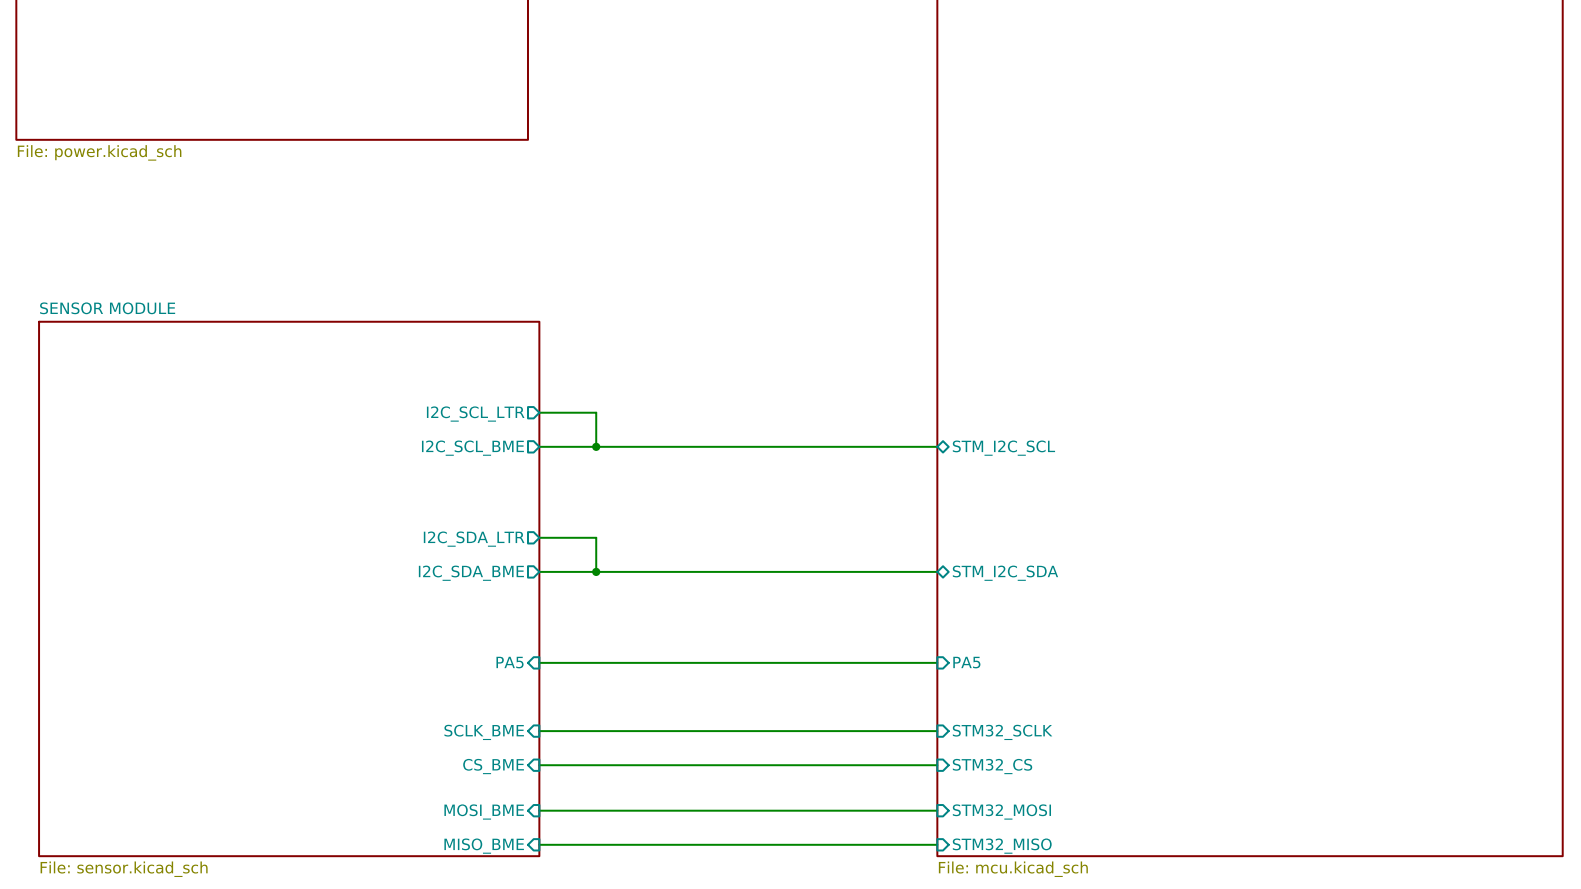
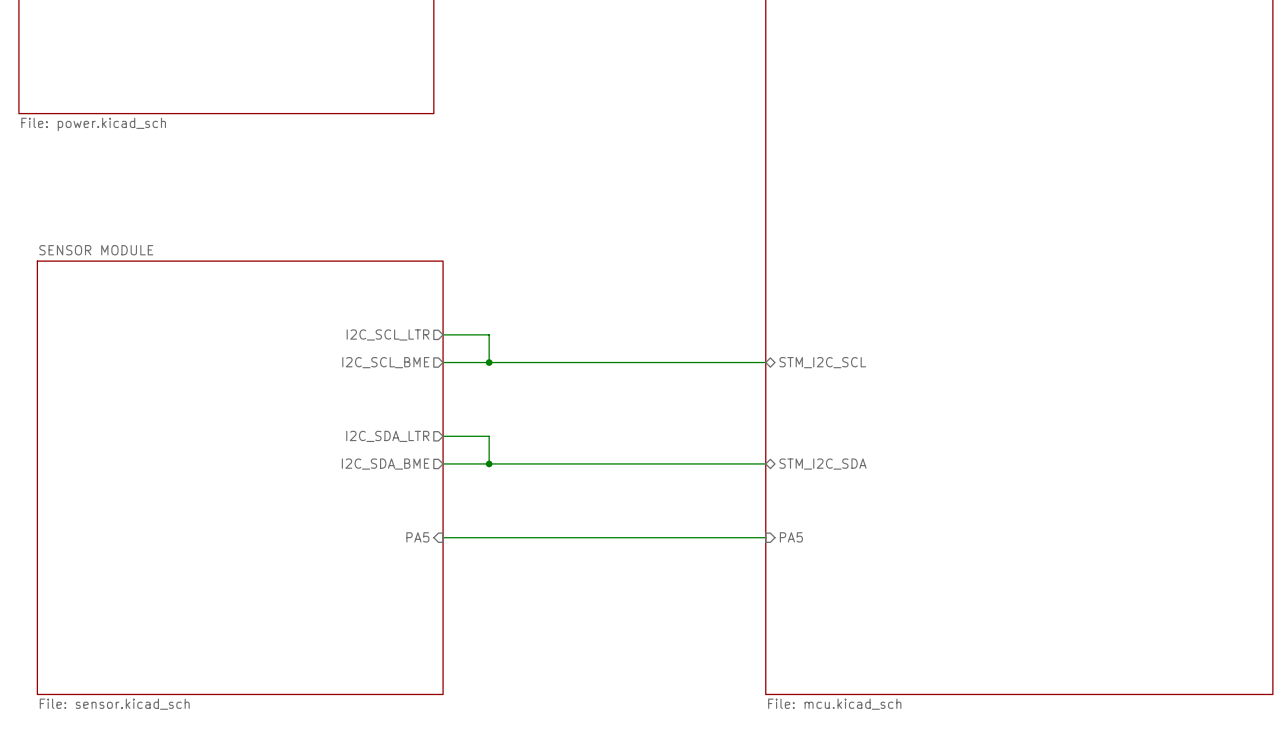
wire: (539, 731) (937, 731) -> none
sheet pin: SCLK_BME (484, 732) -> none
sheet pin: STM32_SCLK (1002, 732) -> none
wire: (539, 765) (937, 765) -> none
sheet pin: CS_BME (493, 766) -> none
sheet pin: STM32_CS (992, 766) -> none
wire: (539, 810) (937, 810) -> none
sheet pin: MOSI_BME (484, 812) -> none
sheet pin: STM32_MOSI (1001, 812) -> none
wire: (539, 844) (937, 844) -> none
sheet pin: MISO_BME (484, 846) -> none
sheet pin: STM32_MISO (1002, 846) -> none

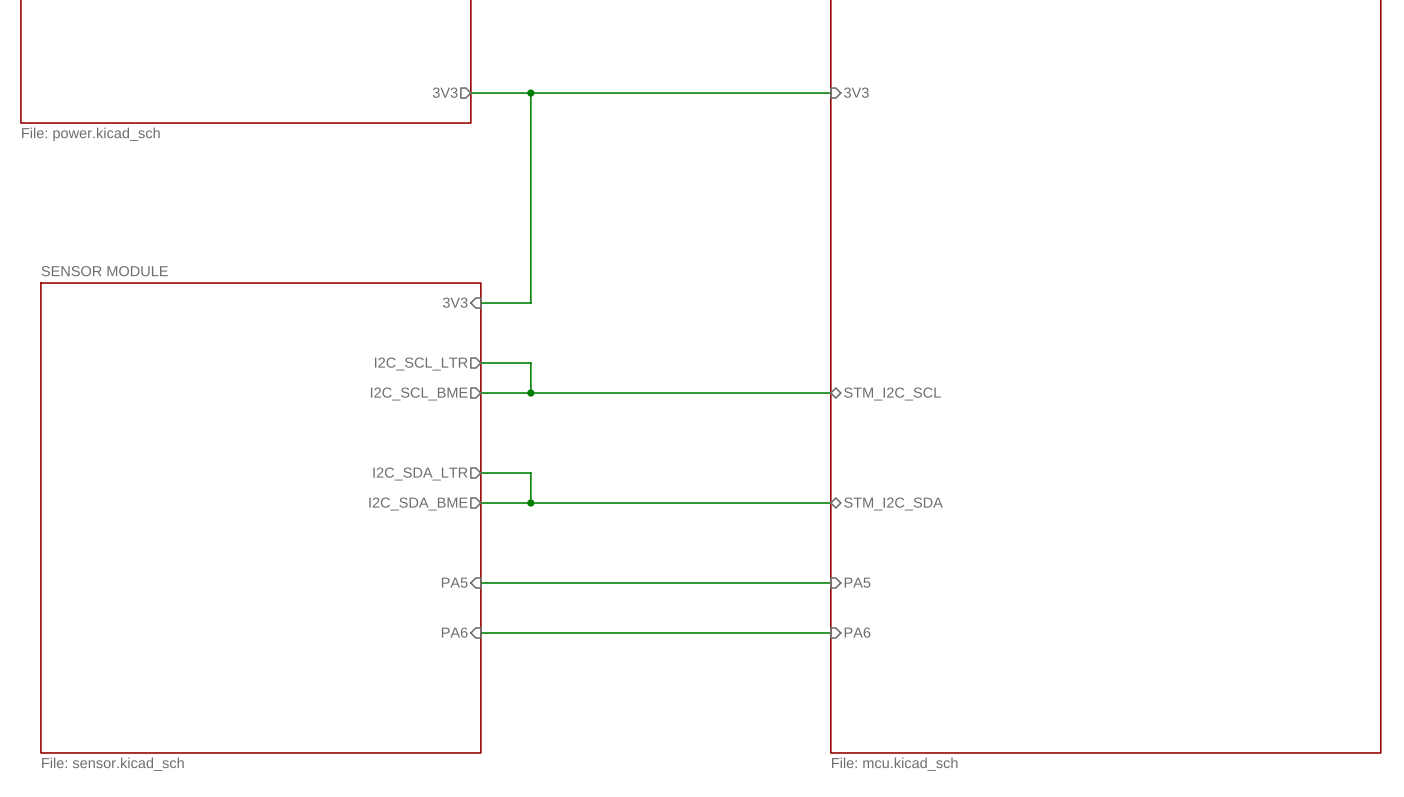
sheet pin: none -> 3V3 (445, 92)
wire: none -> (470, 93) (830, 93)
wire: none -> (530, 93) (530, 303) (480, 303)
junction: none -> (530, 93)
sheet pin: none -> 3V3 (856, 92)
sheet pin: none -> 3V3 (455, 302)
sheet pin: none -> PA6 (454, 632)
wire: none -> (480, 632) (830, 632)
sheet pin: none -> PA6 (857, 632)

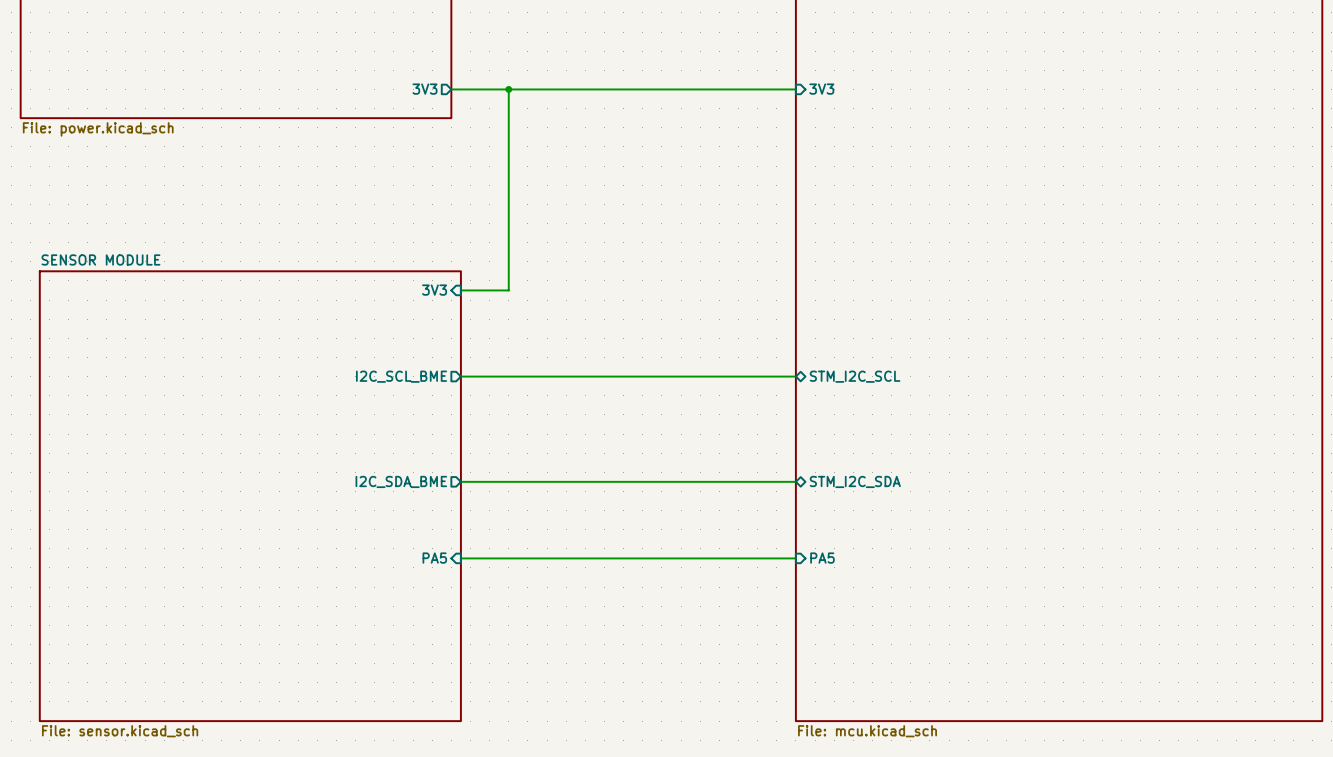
wire: (480, 363) (530, 363) (530, 393) -> none
sheet pin: I2C_SCL_LTR (421, 364) -> none
junction: (530, 393) -> none
wire: (480, 473) (530, 473) (530, 503) -> none
sheet pin: I2C_SDA_LTR (420, 474) -> none
junction: (530, 503) -> none
sheet pin: PA6 (454, 632) -> none
wire: (480, 632) (830, 632) -> none
sheet pin: PA6 (857, 632) -> none

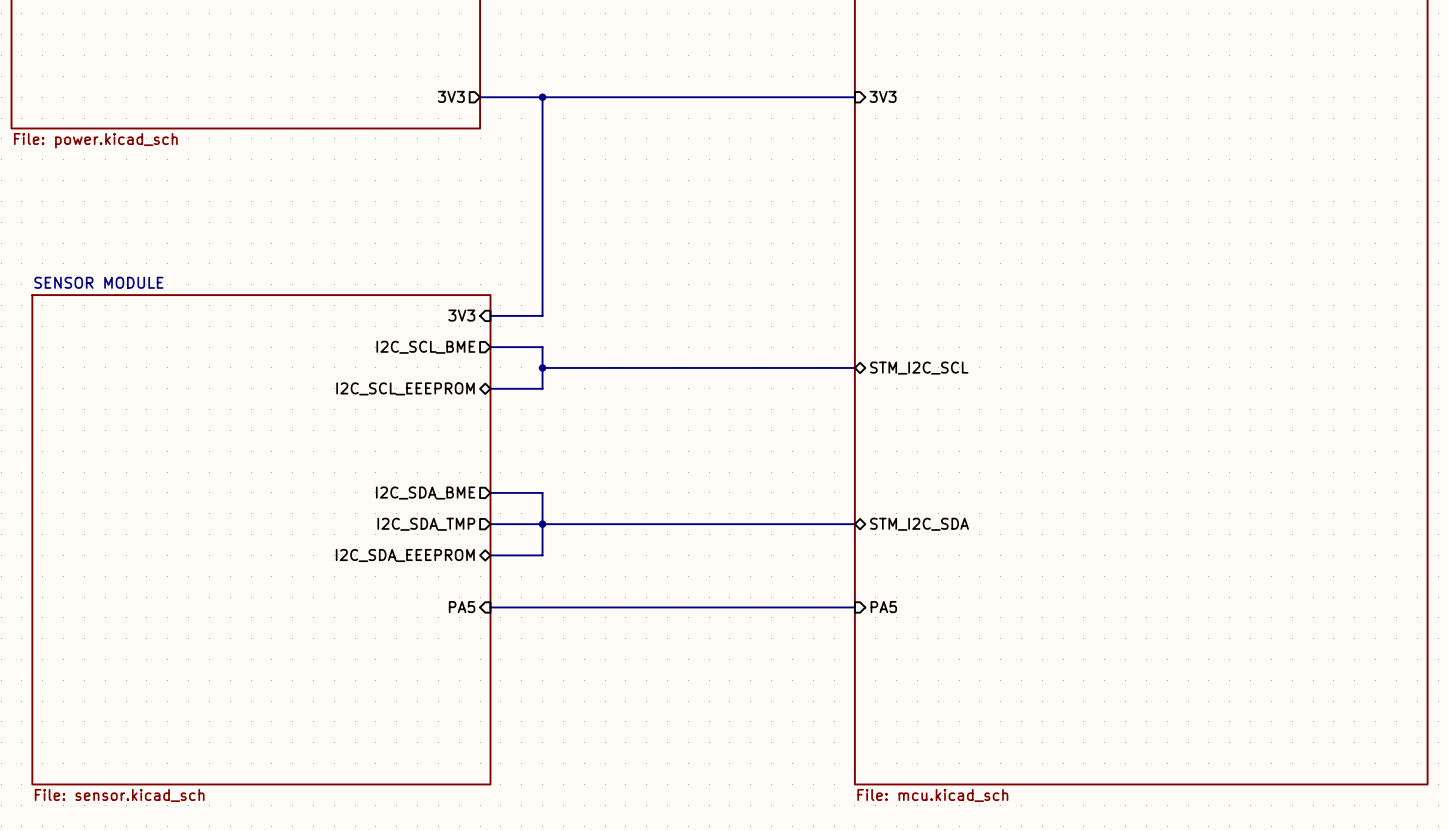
wire: none -> (490, 347) (542, 347) (542, 388) (490, 388)
wire: none -> (542, 367) (854, 367)
junction: none -> (542, 367)
sheet pin: none -> I2C_SCL_EEEPROM (405, 388)
sheet pin position: I2C_SCL_BME (401, 376) -> I2C_SCL_BME (425, 347)
wire: (460, 376) (795, 376) -> none
sheet pin position: STM_I2C_SCL (855, 376) -> STM_I2C_SCL (919, 368)
sheet pin: none -> I2C_SDA_BME (425, 493)
wire: none -> (490, 492) (542, 492) (542, 555) (490, 555)
sheet pin: I2C_SDA_BME (401, 481) -> I2C_SDA_TMP (426, 524)
junction: none -> (542, 524)
sheet pin: none -> I2C_SDA_EEEPROM (405, 555)

